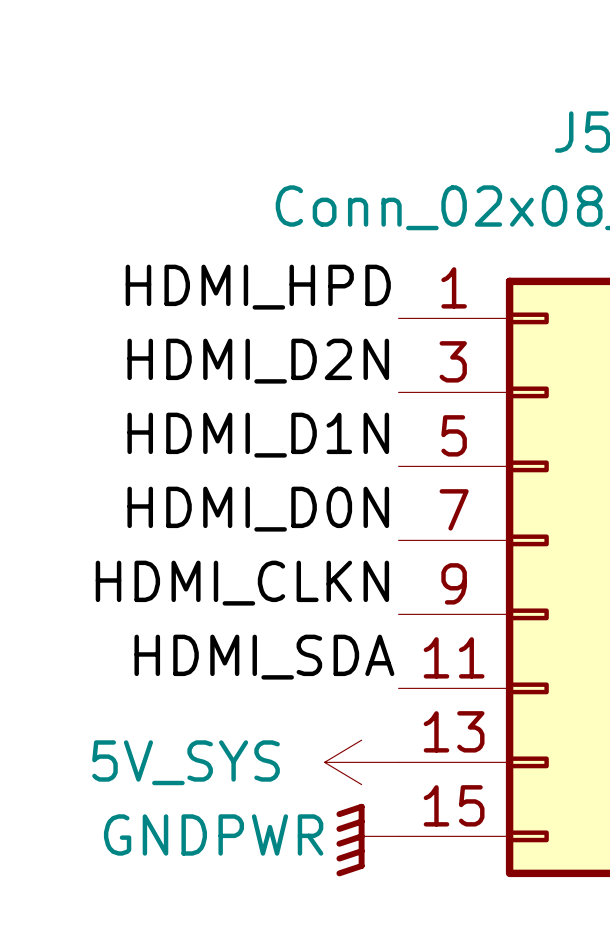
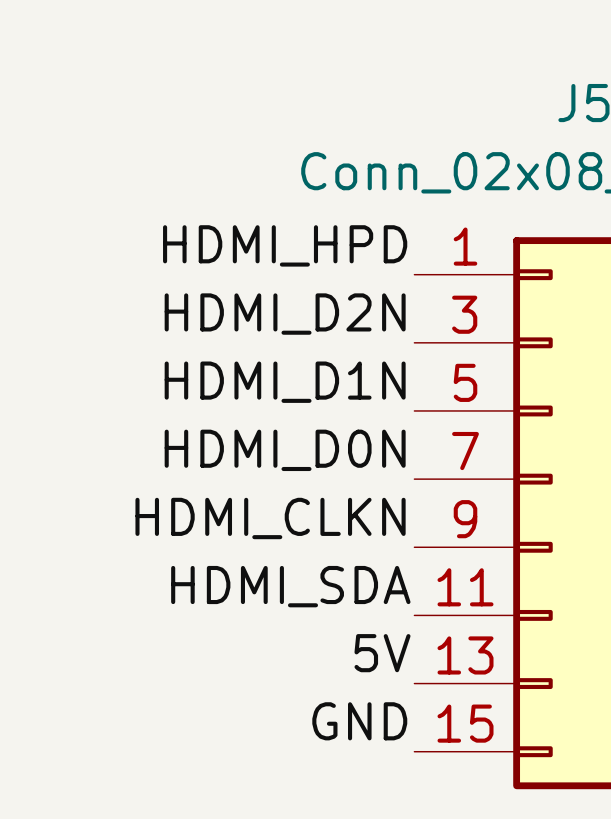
label: none -> 5V (382, 653)
power symbol: 5V_SYS (361, 762) -> none
label: none -> GND (359, 721)
power symbol: GNDPWR (367, 840) -> none

